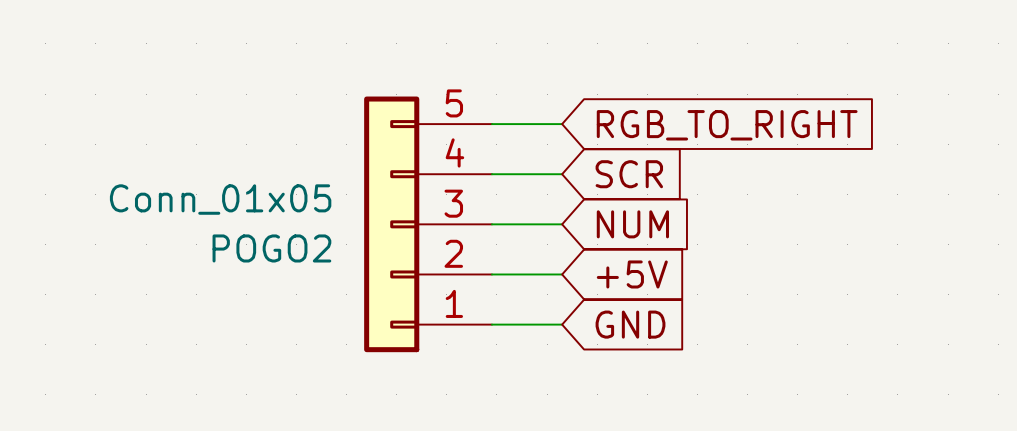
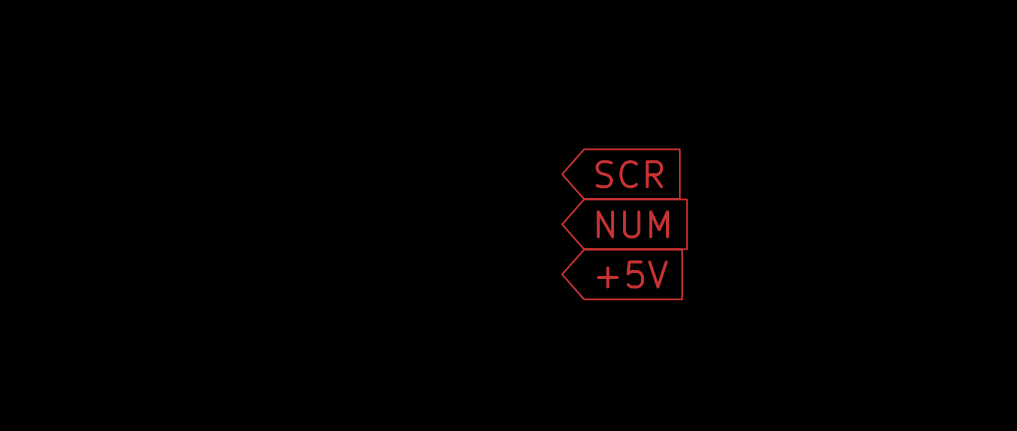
wire: (491, 124) (562, 124) -> none
global label: RGB_TO_RIGHT (727, 125) -> none
wire: (491, 174) (562, 174) -> none
POGO2: Conn_01x05 (428, 224) -> none
wire: (491, 224) (562, 224) -> none
wire: (491, 274) (562, 274) -> none
wire: (491, 324) (562, 324) -> none
global label: GND (630, 324) -> none

